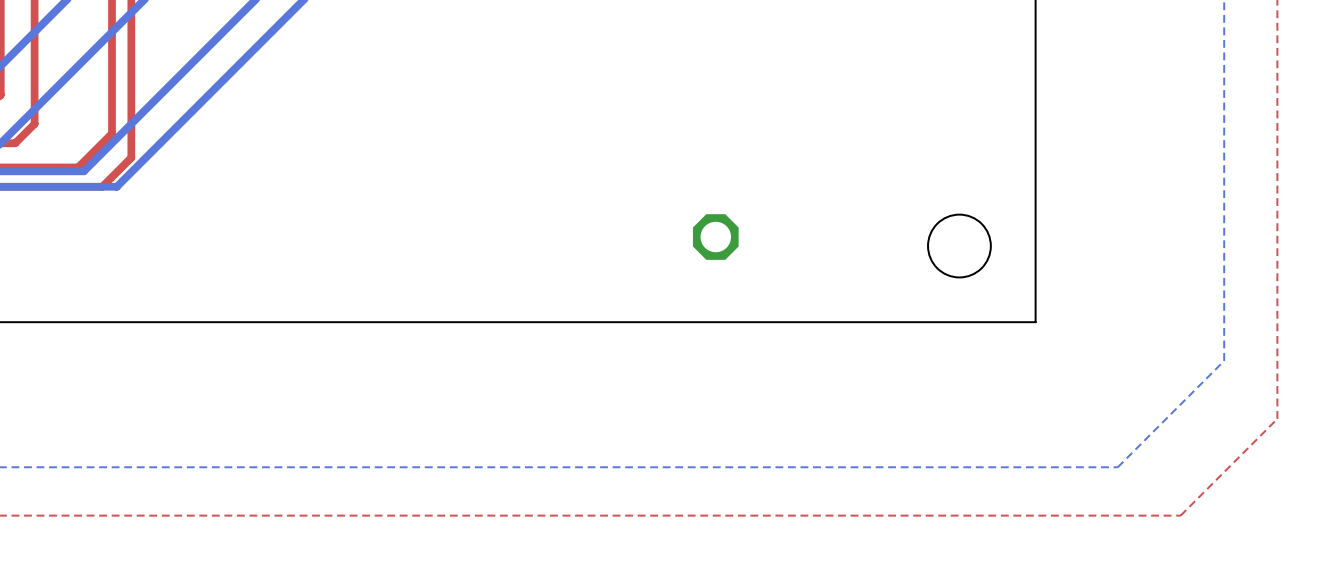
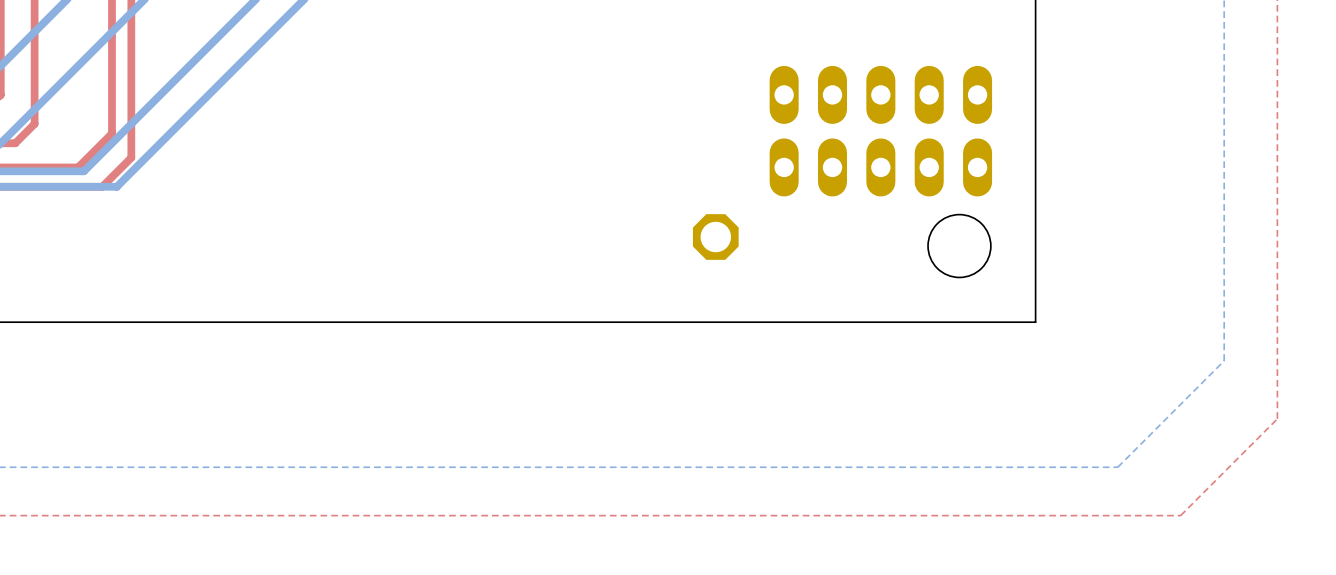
part: none -> (880, 94)
part: none -> (880, 167)

